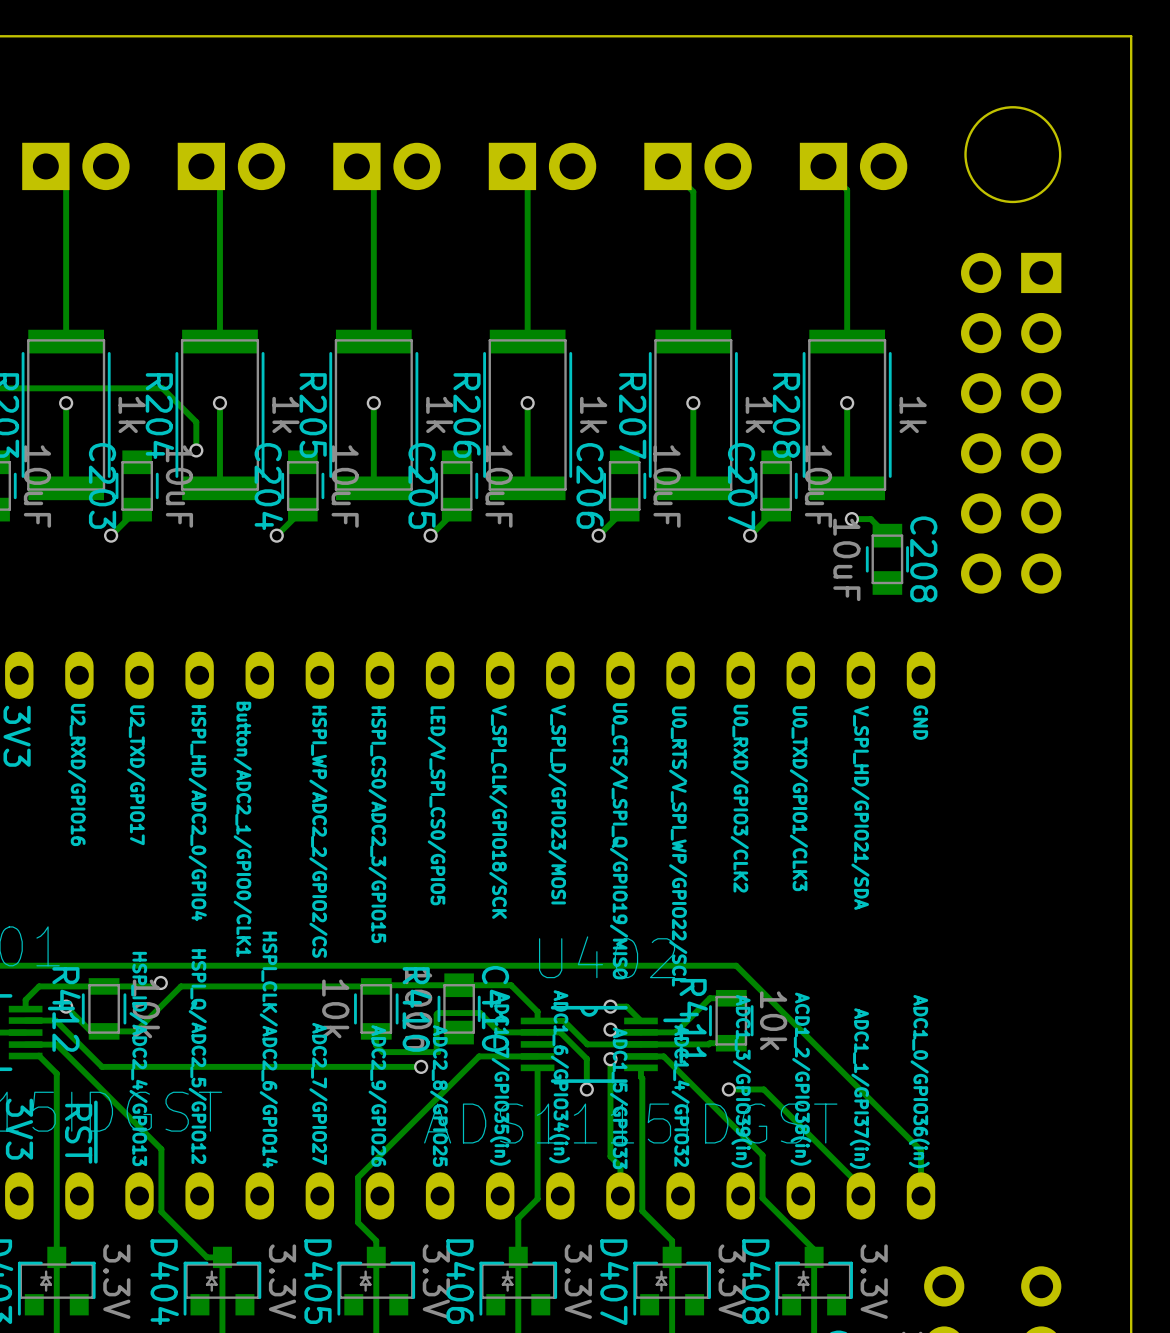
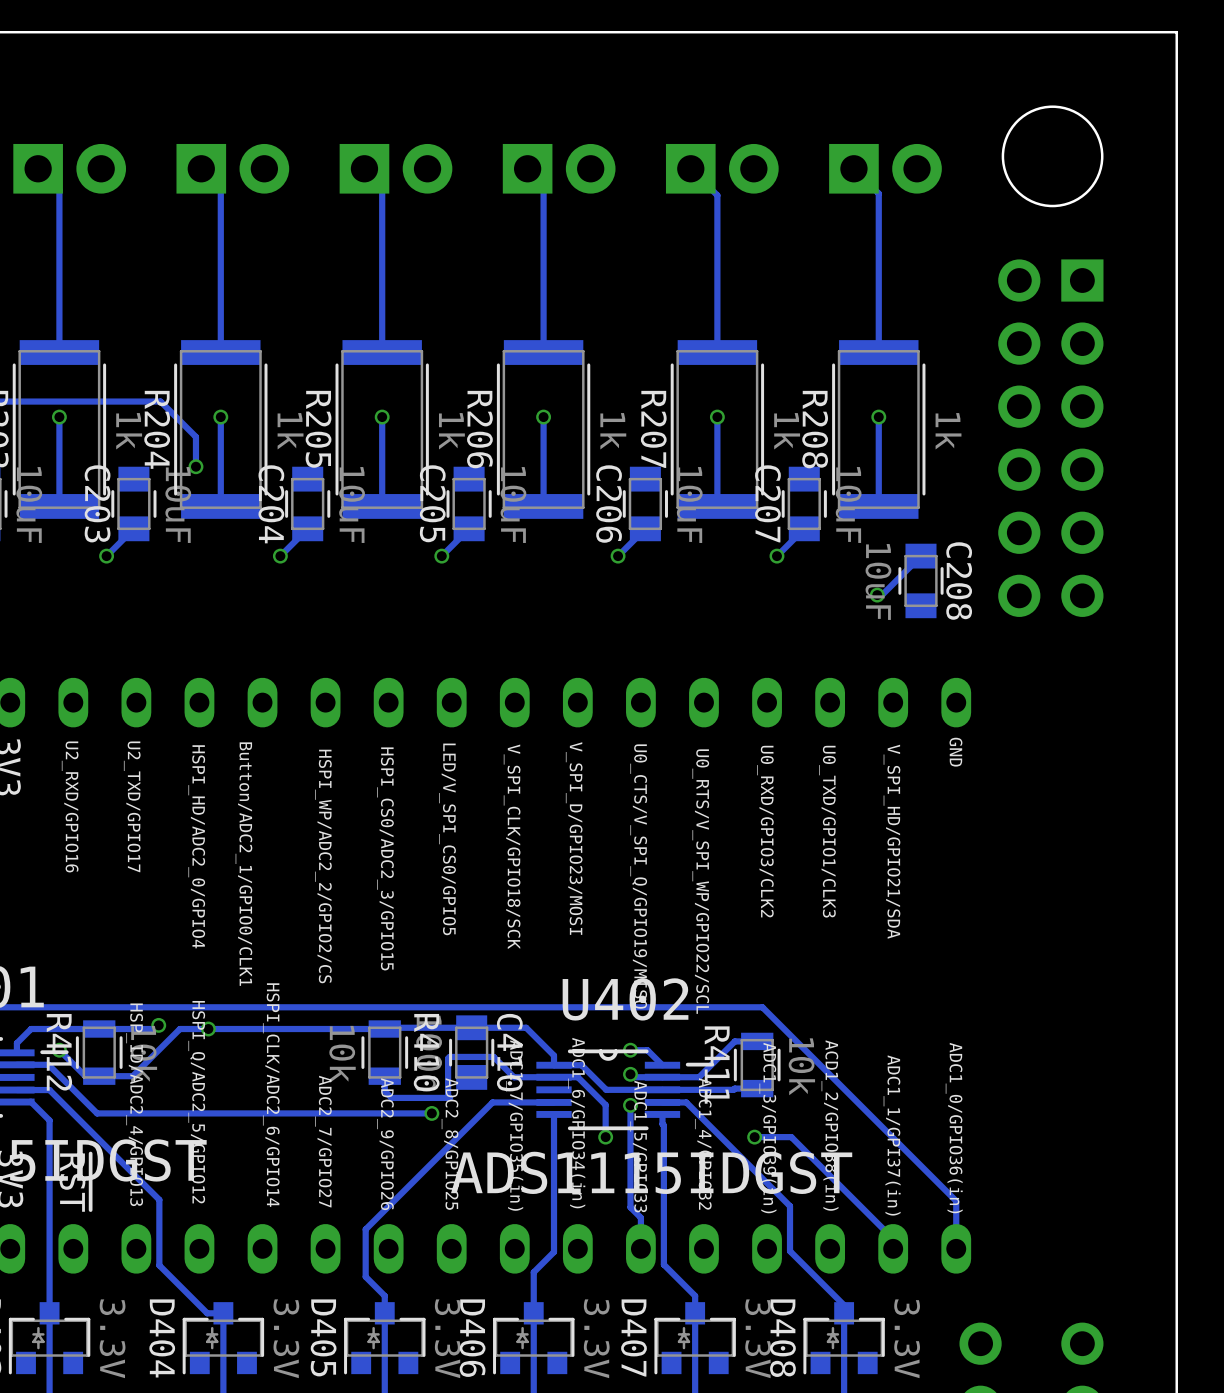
track: (851, 519) (870, 519) (887, 535) -> (877, 595) (882, 595) (920, 556)
via position: (851, 519) -> (877, 595)
via: none -> (208, 1029)

